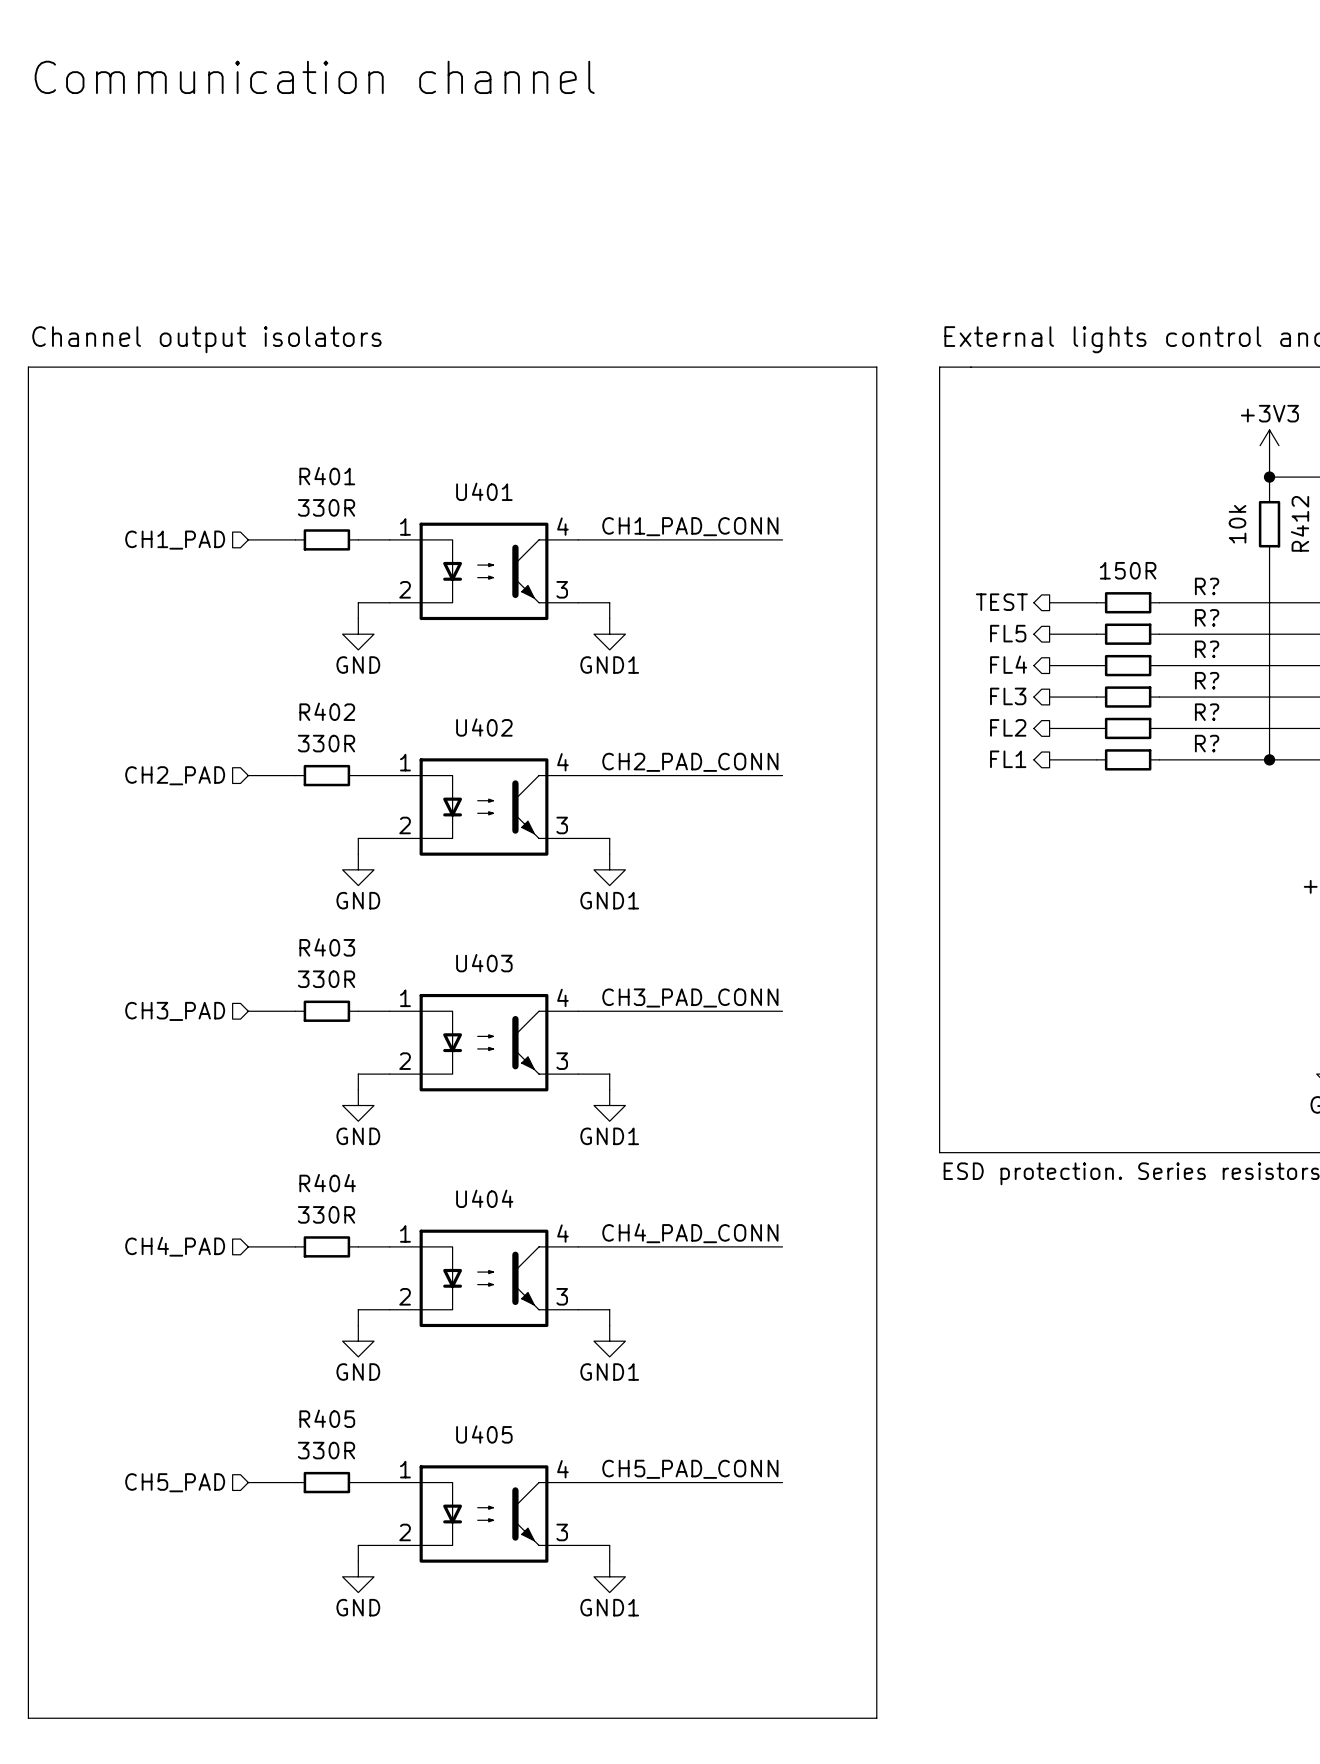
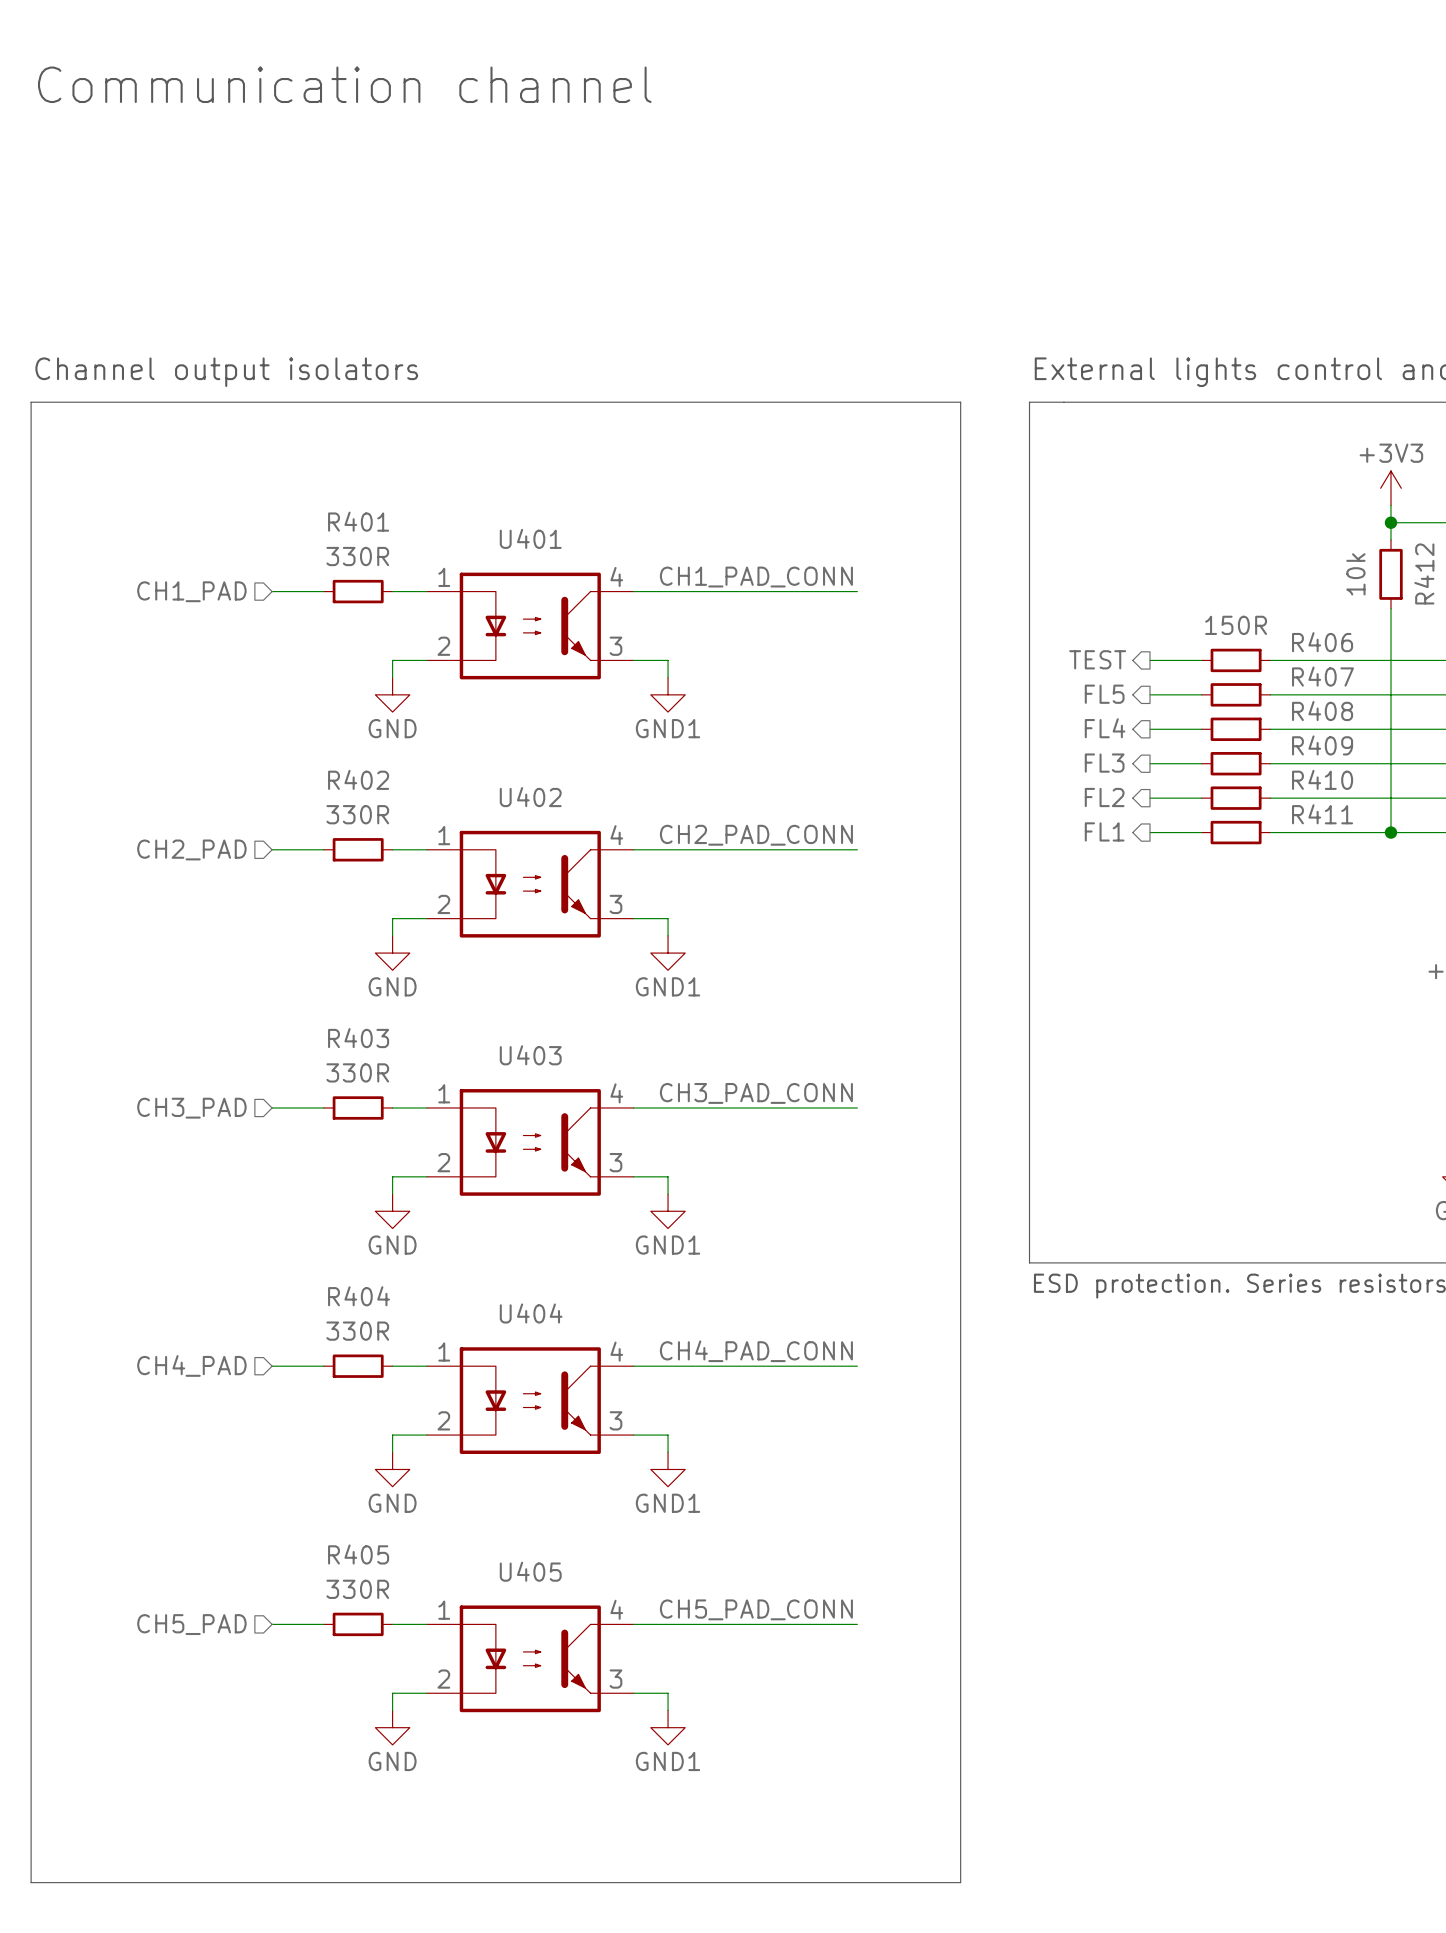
R? name: R? (1207, 586) -> R406 (1322, 642)
R? name: R? (1207, 617) -> R407 (1322, 676)
R? name: R? (1207, 649) -> R408 (1322, 711)
R? name: R? (1207, 680) -> R409 (1322, 745)
R? name: R? (1207, 712) -> R410 (1322, 779)
R? name: R? (1207, 743) -> R411 (1322, 814)

